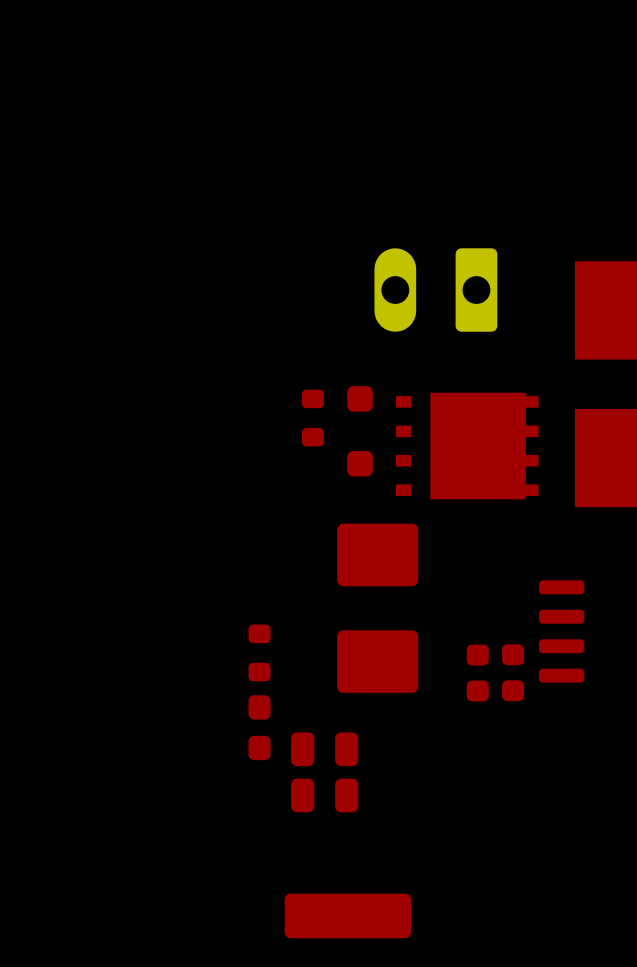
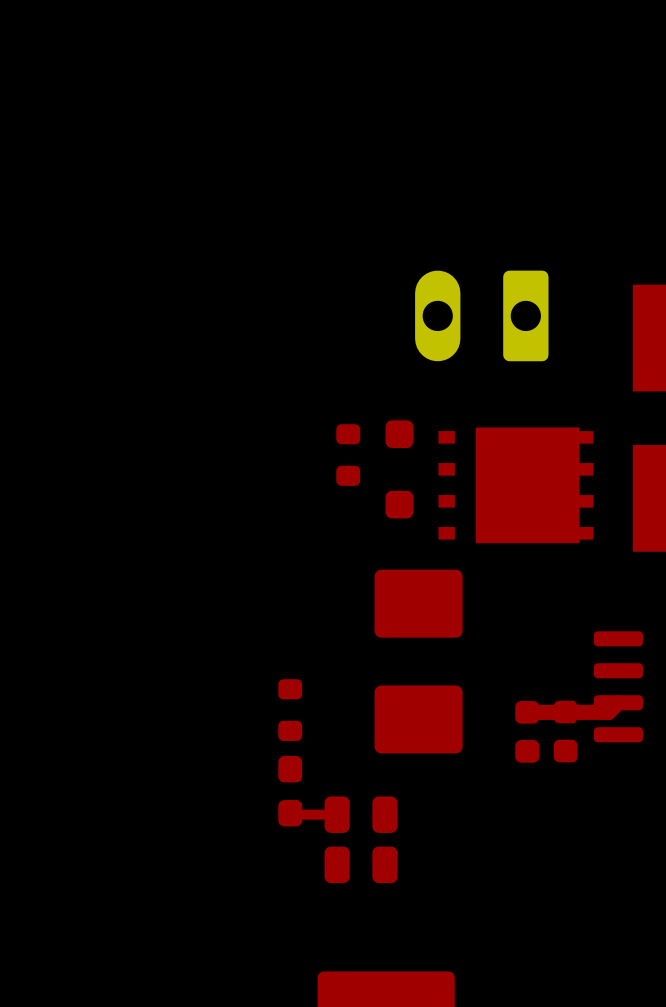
top track: none -> (618, 702) (608, 712) (527, 712)
top track: none -> (290, 813) (337, 814)

